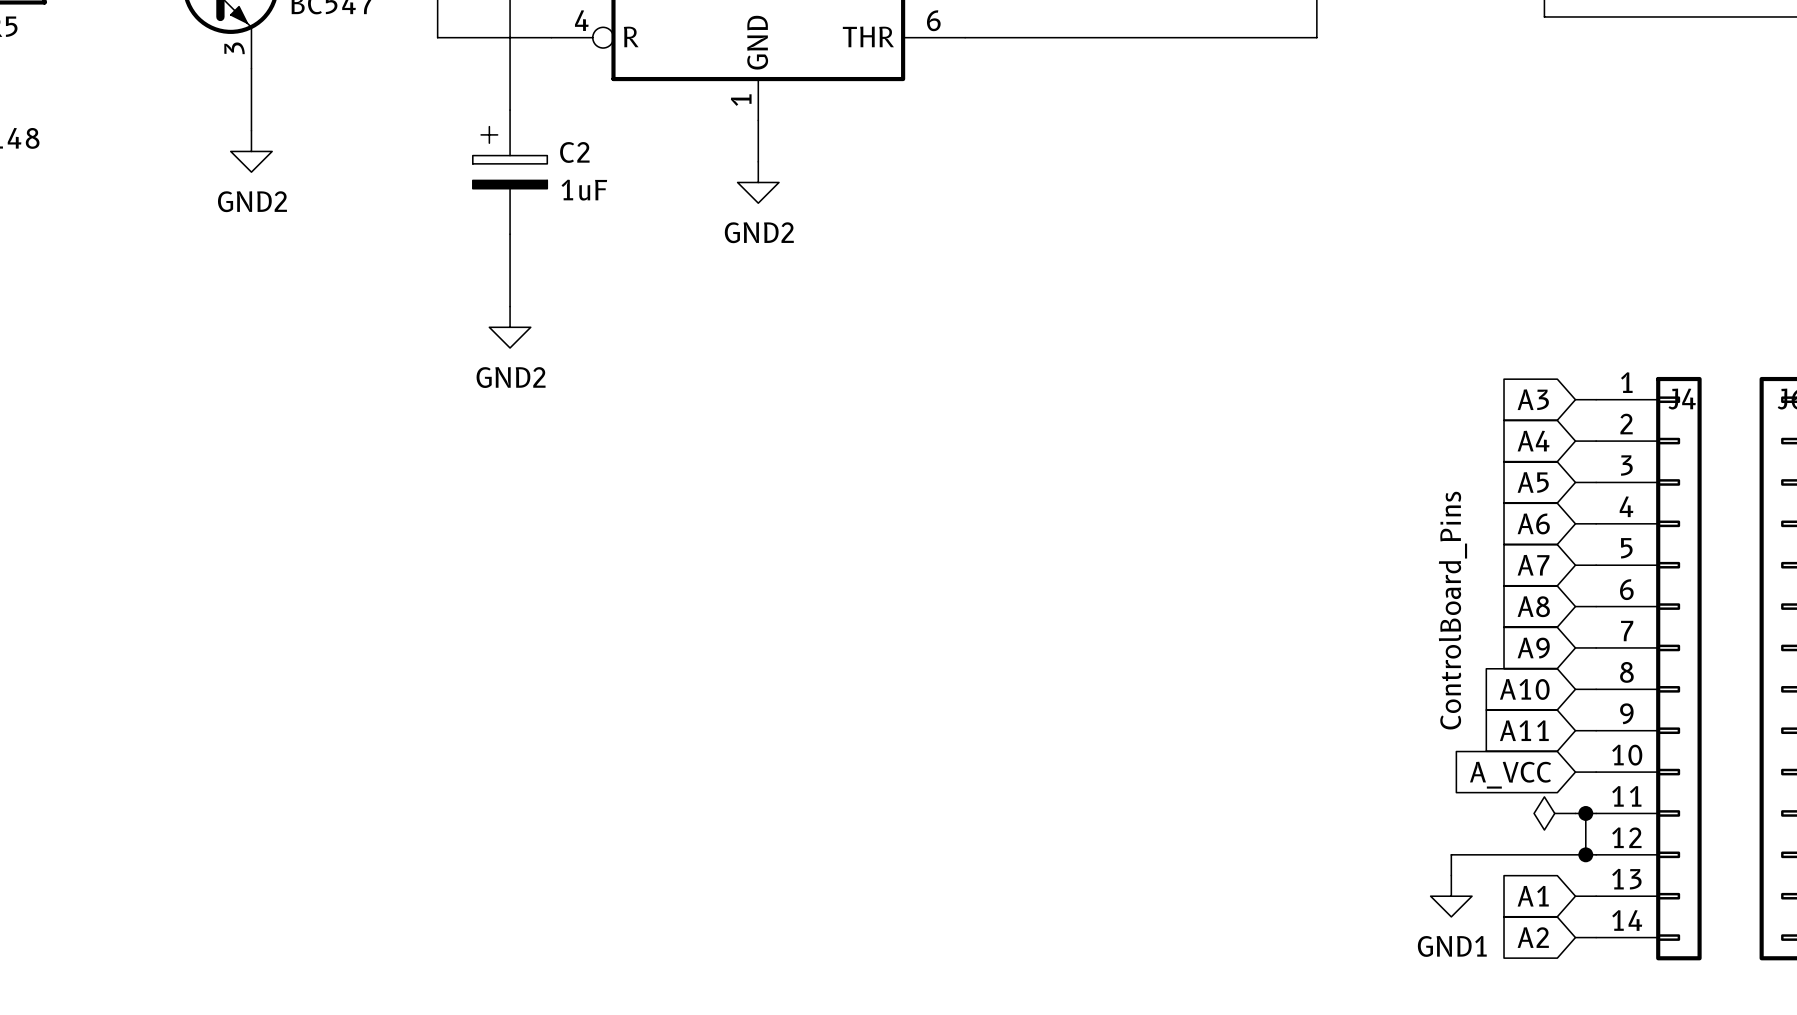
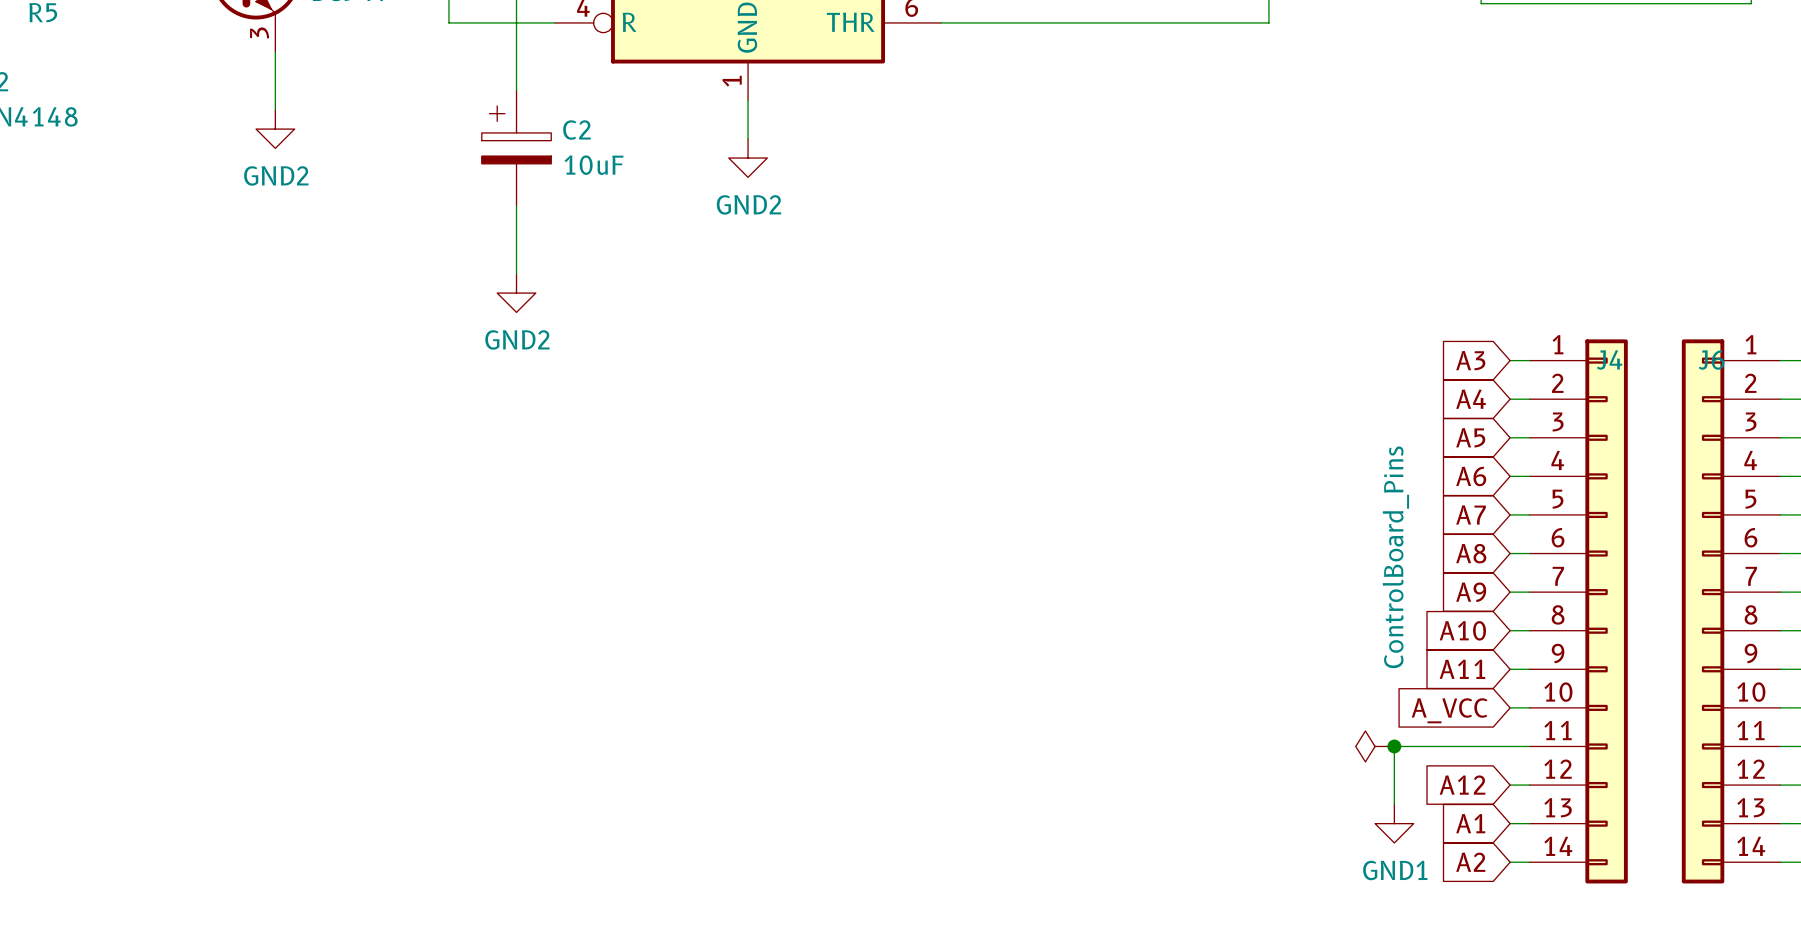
C2 value: 1uF (584, 190) -> 10uF (594, 165)
junction: none -> (1394, 746)
power symbol position: (1554, 813) -> (1375, 746)
wire: (1585, 813) (1585, 854) -> none
junction: (1585, 813) -> none
wire: (1451, 854) (1575, 854) -> (1394, 785) (1394, 746) (1510, 746)
global label: none -> A12 (1462, 785)
junction: (1585, 854) -> none

